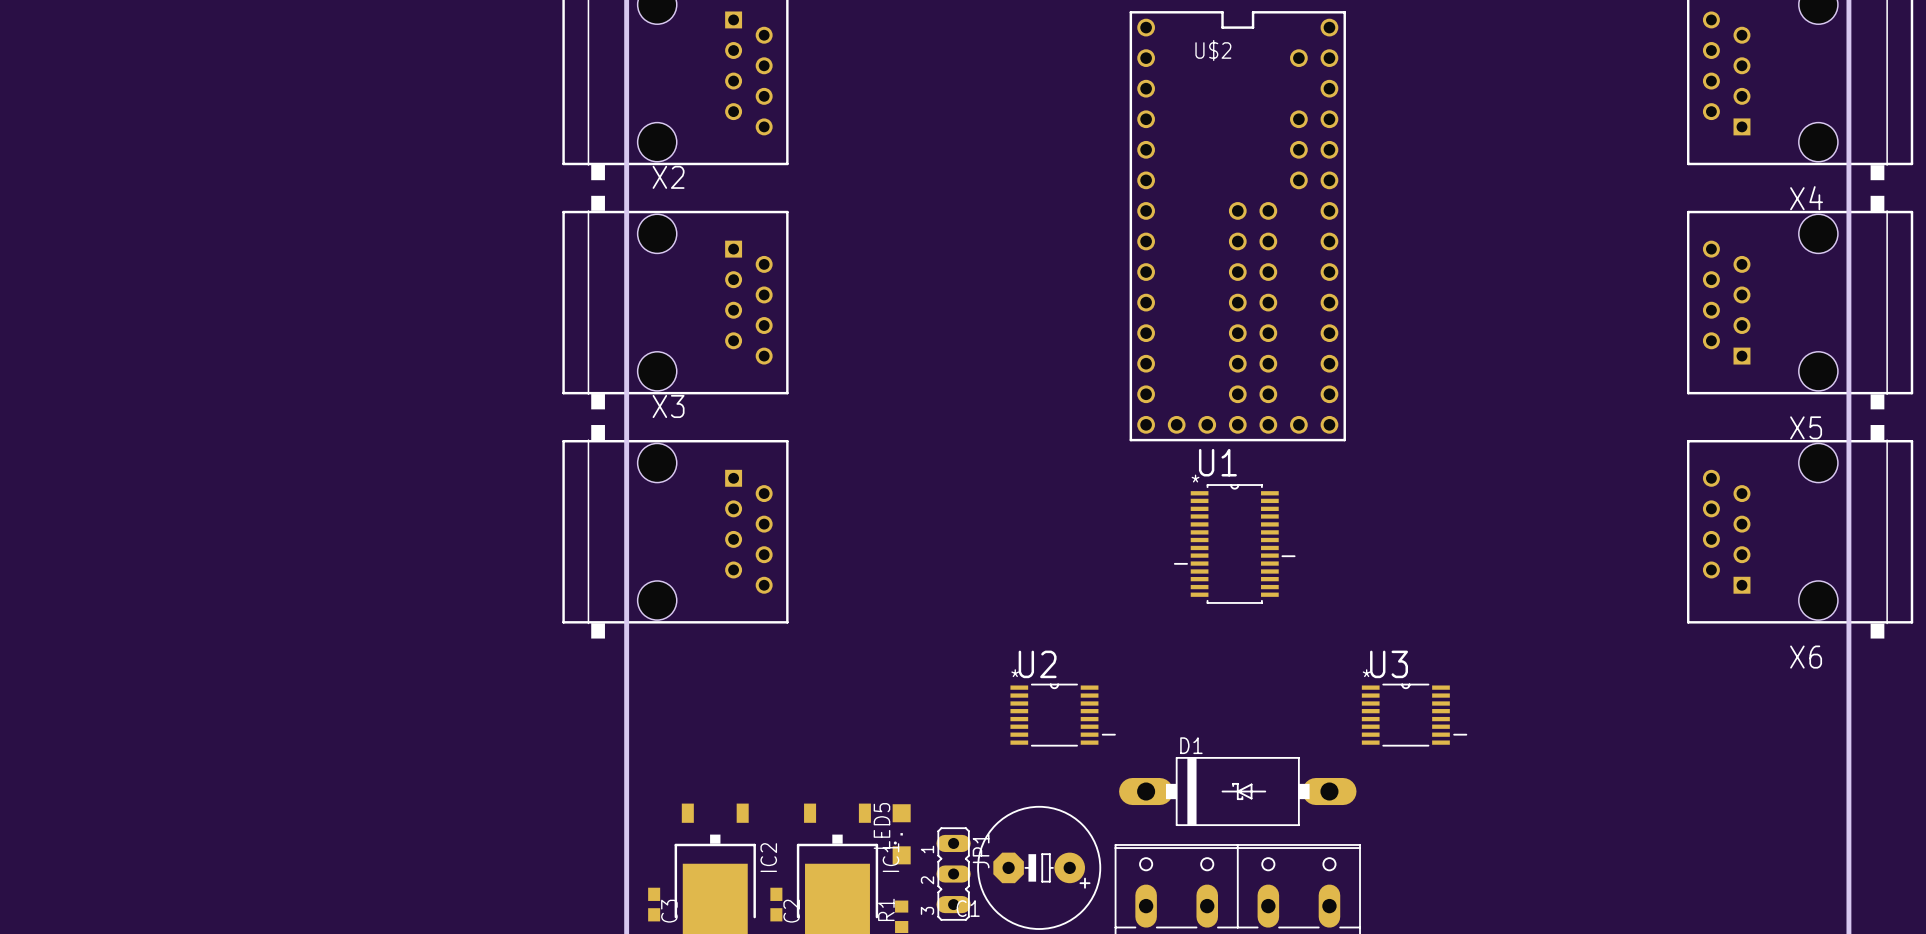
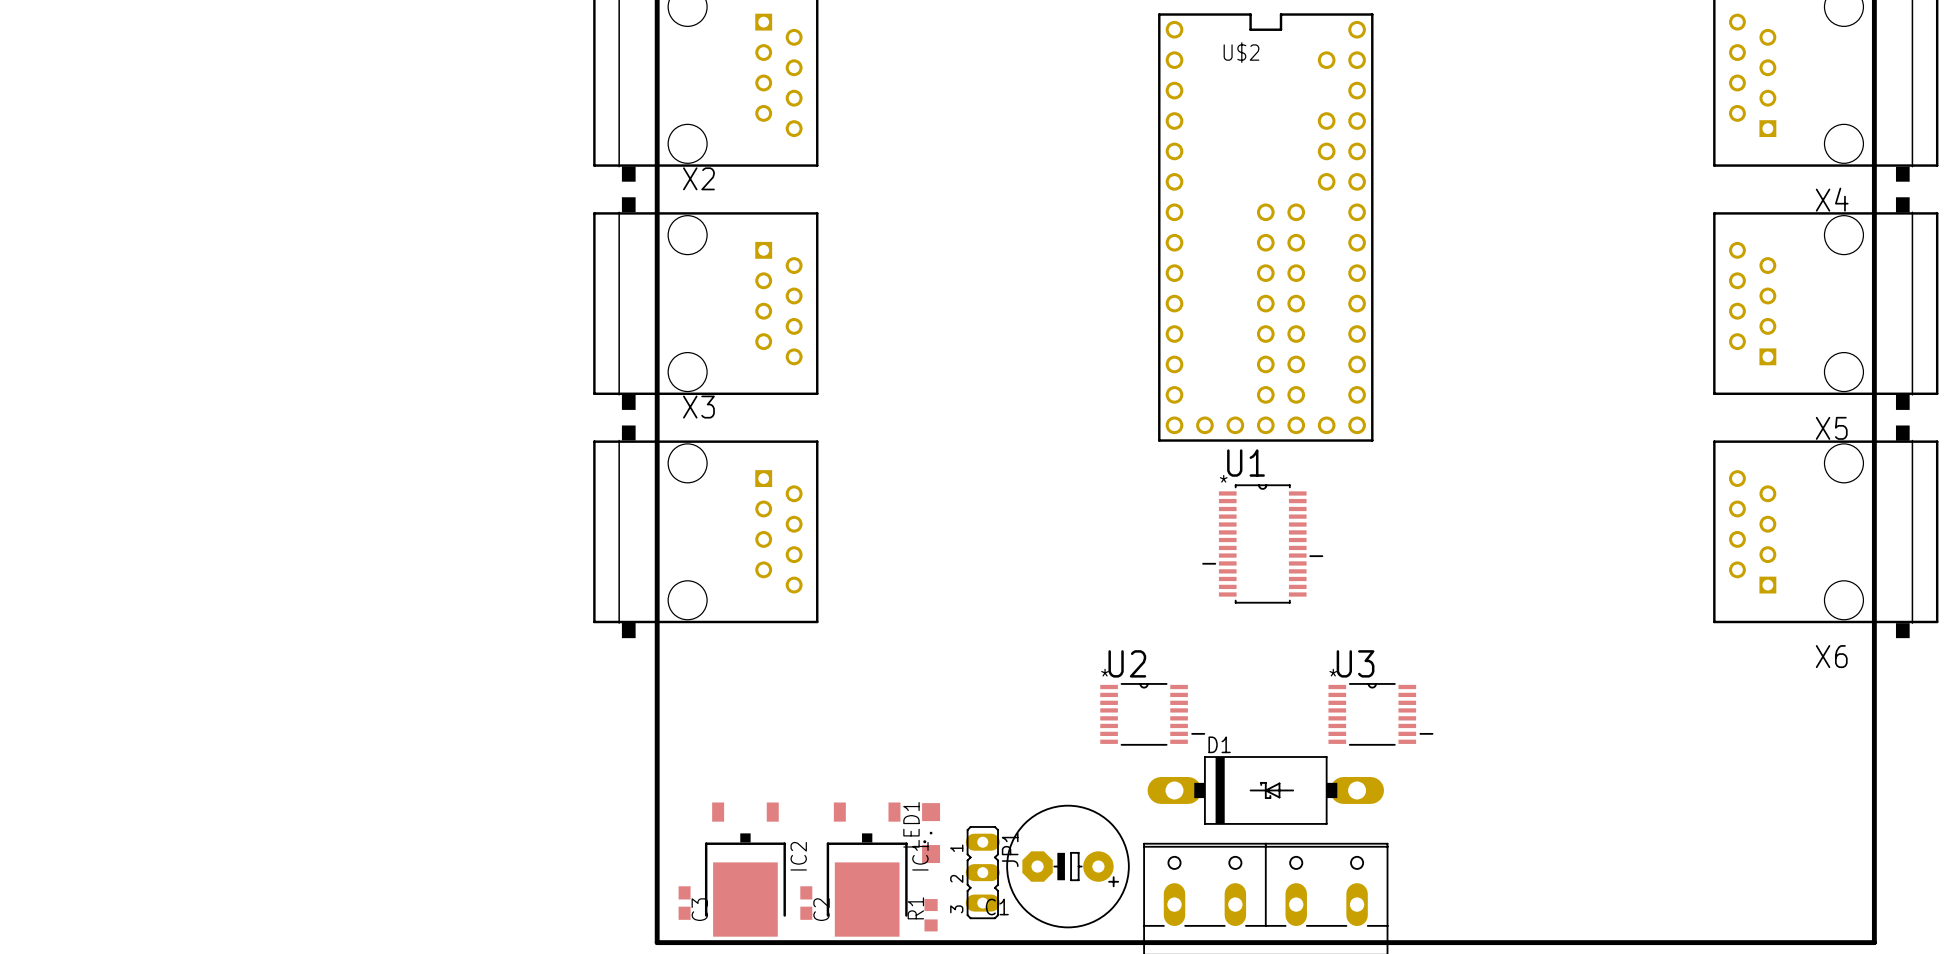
U2 position: (1063, 715) -> (1152, 714)
U3 position: (1414, 715) -> (1380, 714)
LED5 name: LED5 (881, 825) -> LED1 (911, 824)

